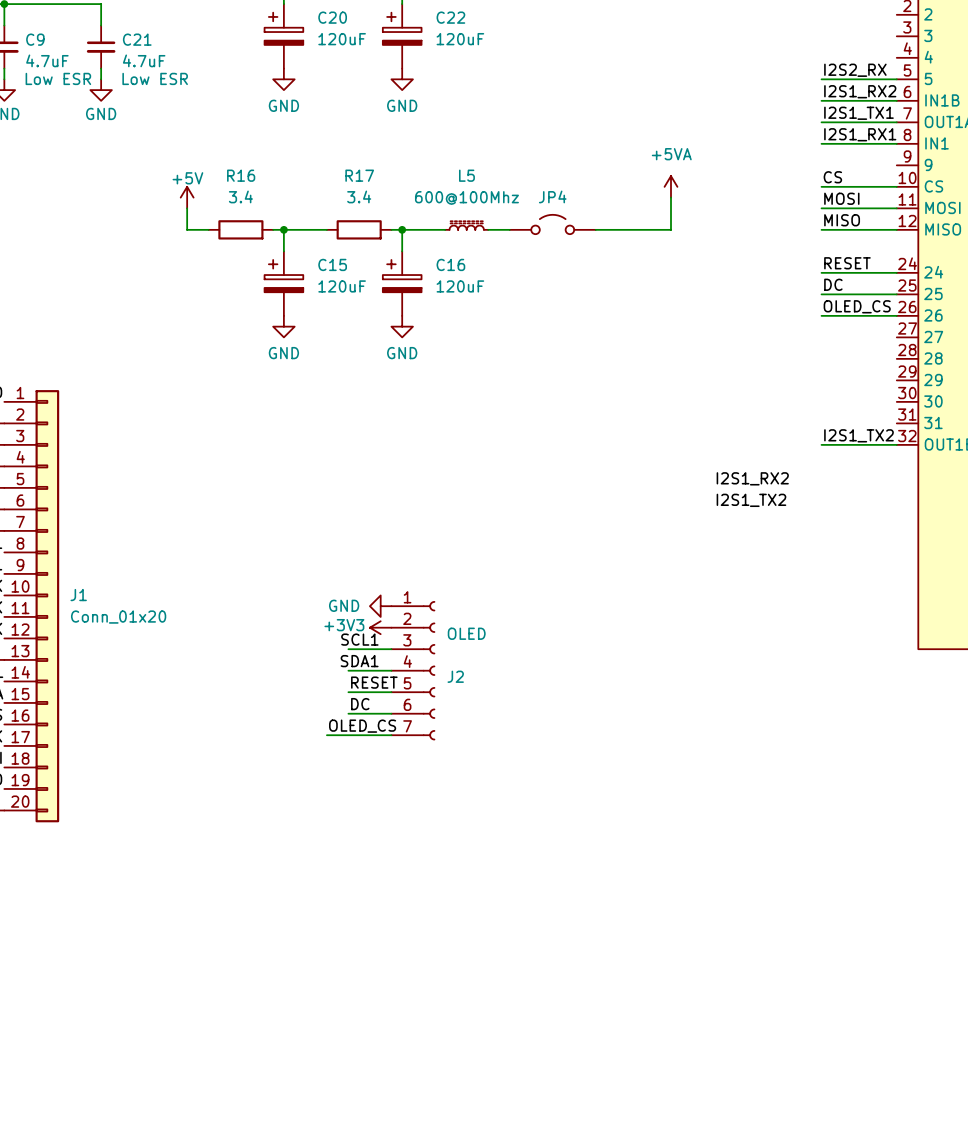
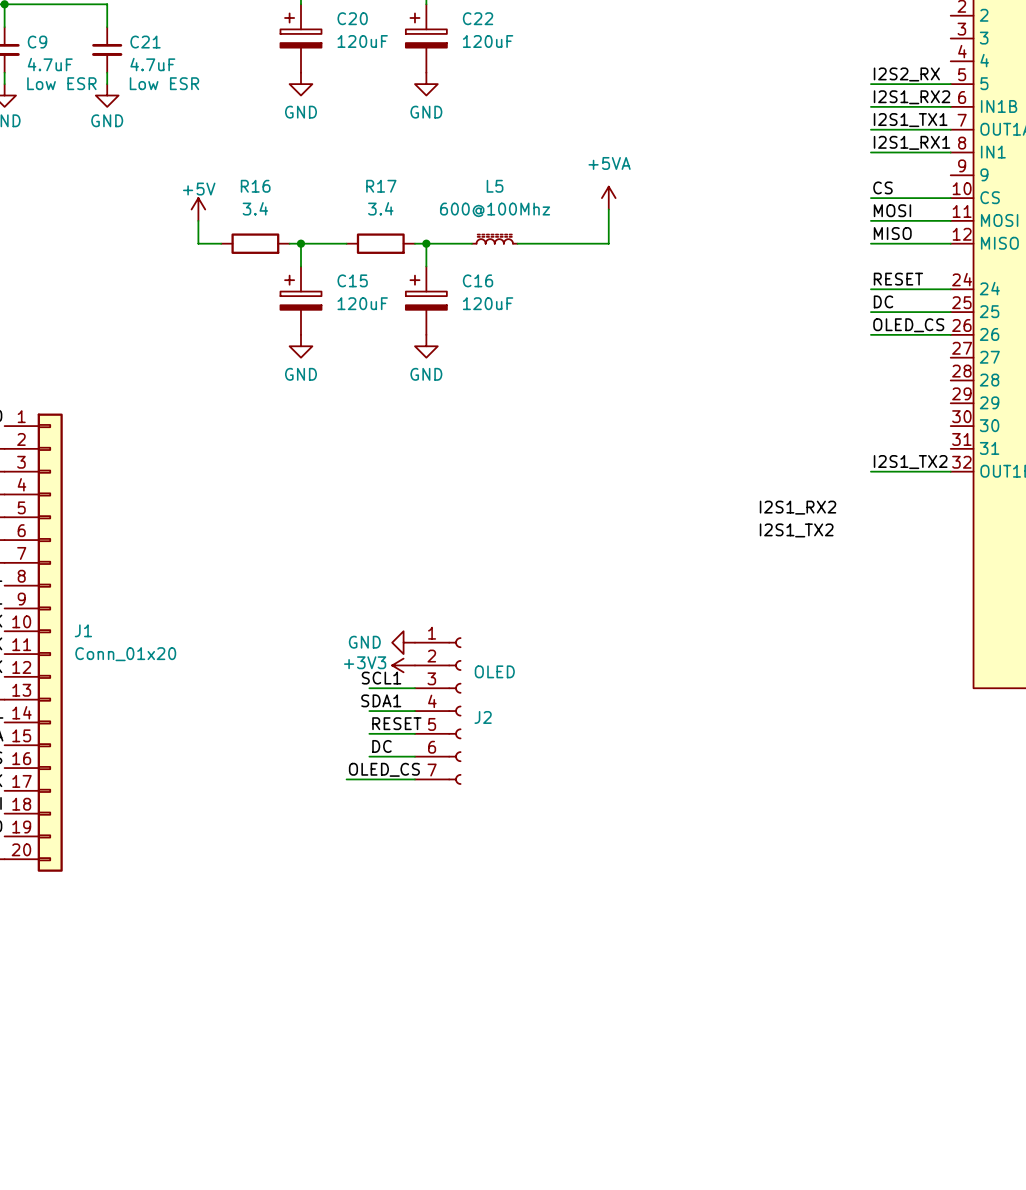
power symbol position: +5VA (670, 186) -> +5VA (608, 198)
wire: none -> (608, 209) (608, 243) (540, 243)
wire: (670, 197) (670, 229) (595, 229) -> none
JP4: (552, 224) -> none

